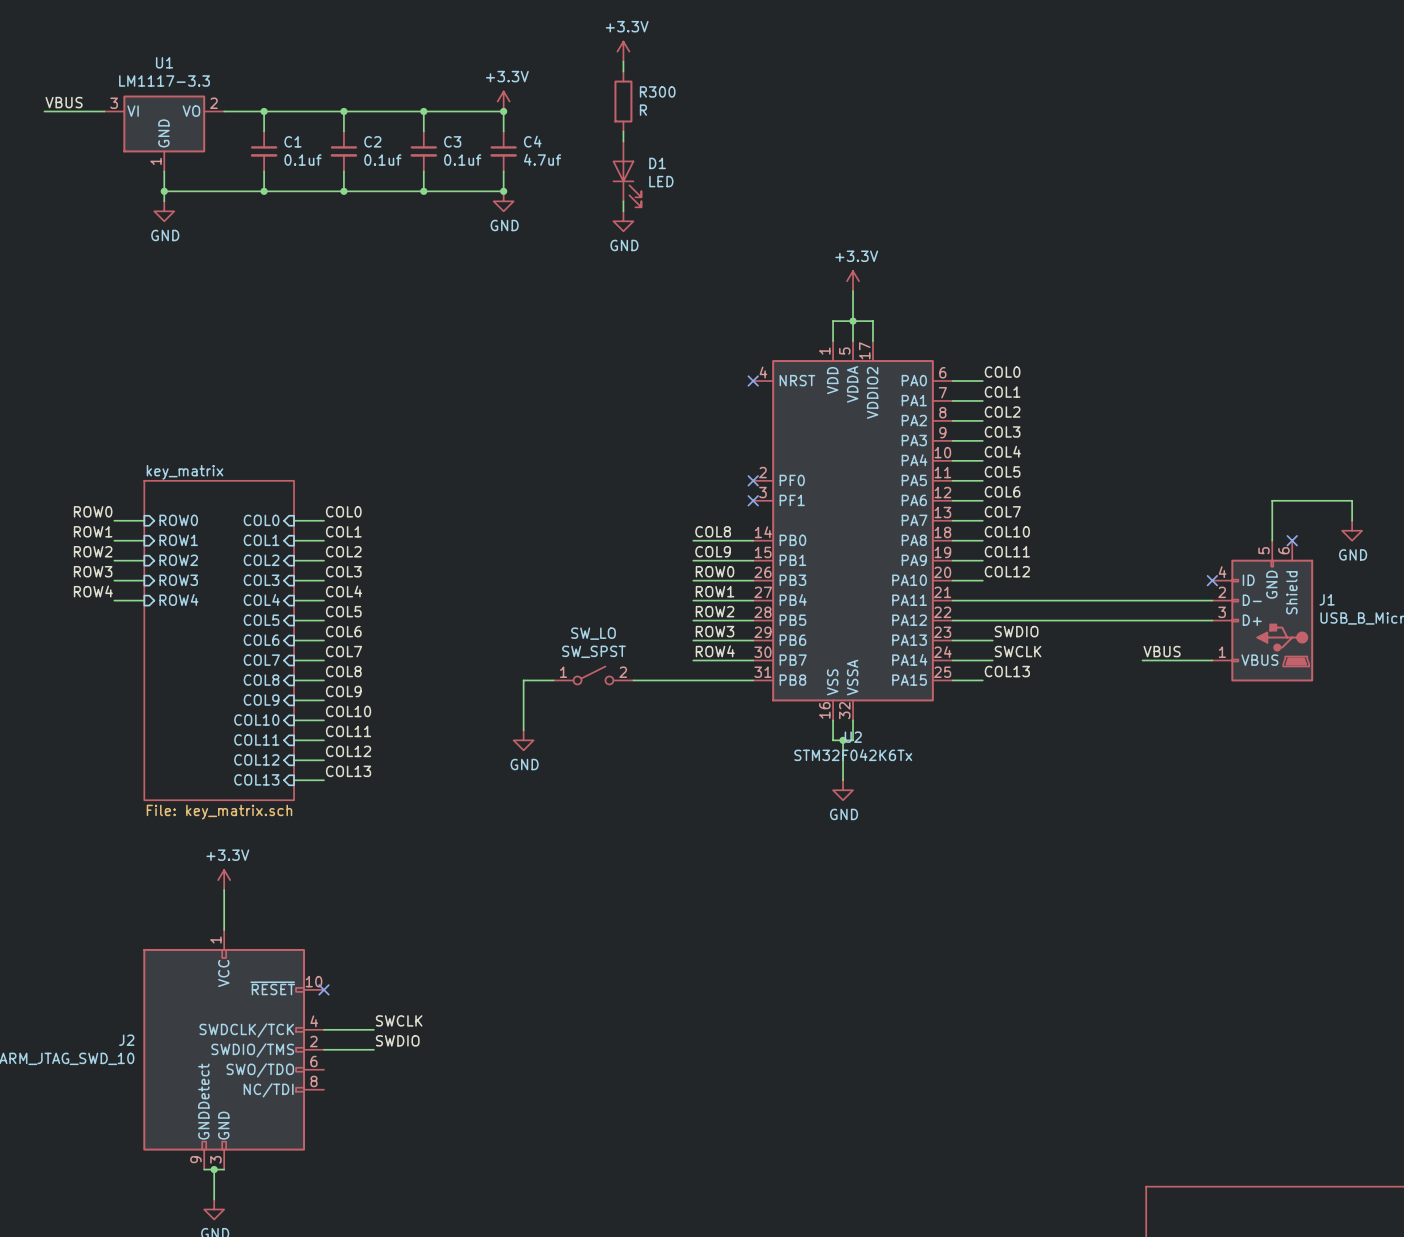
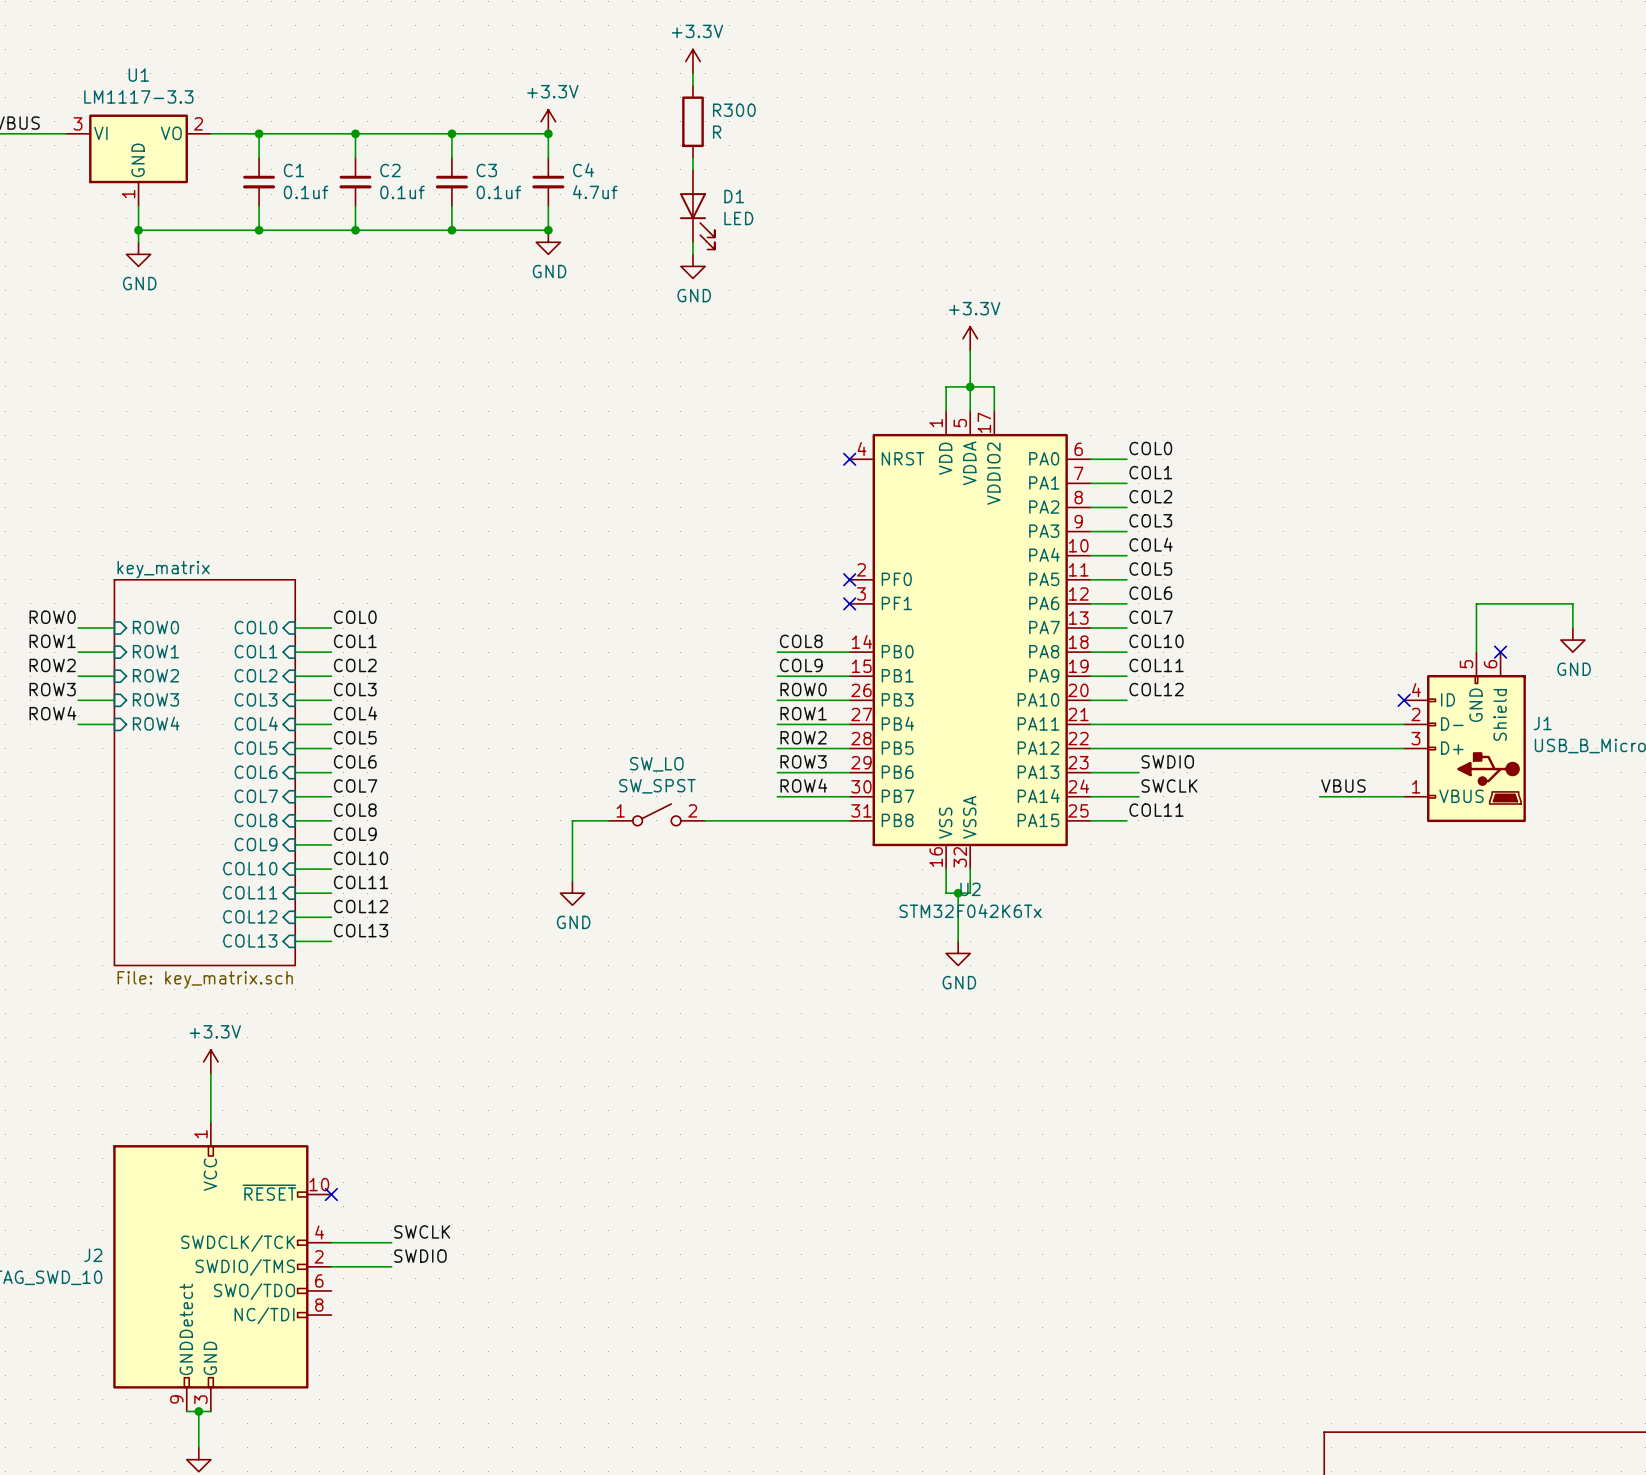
label: COL13 (1007, 671) -> COL11 (1156, 810)

